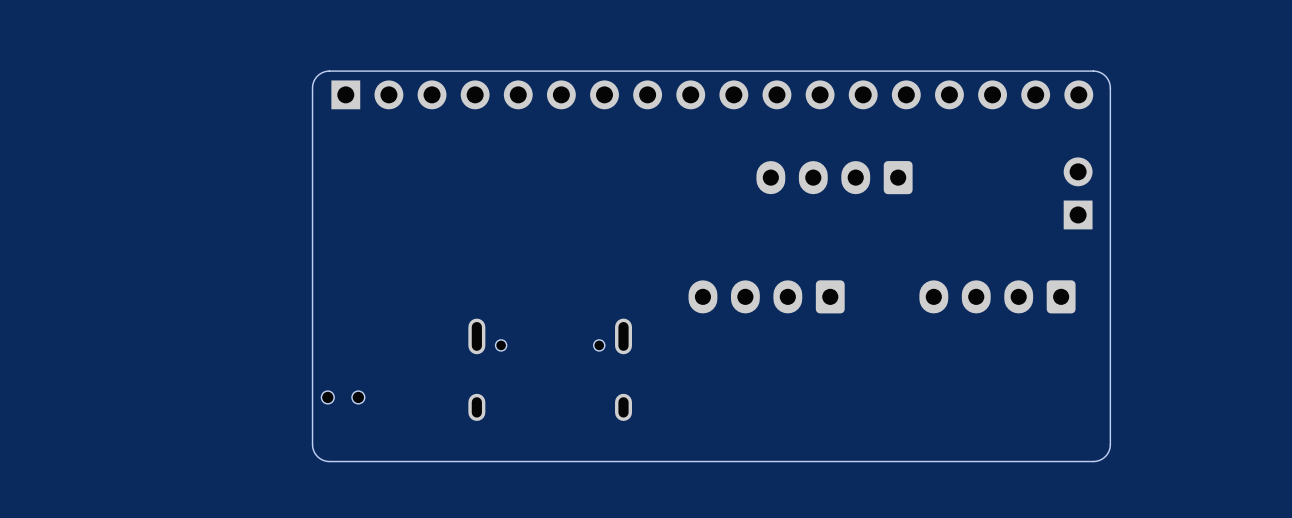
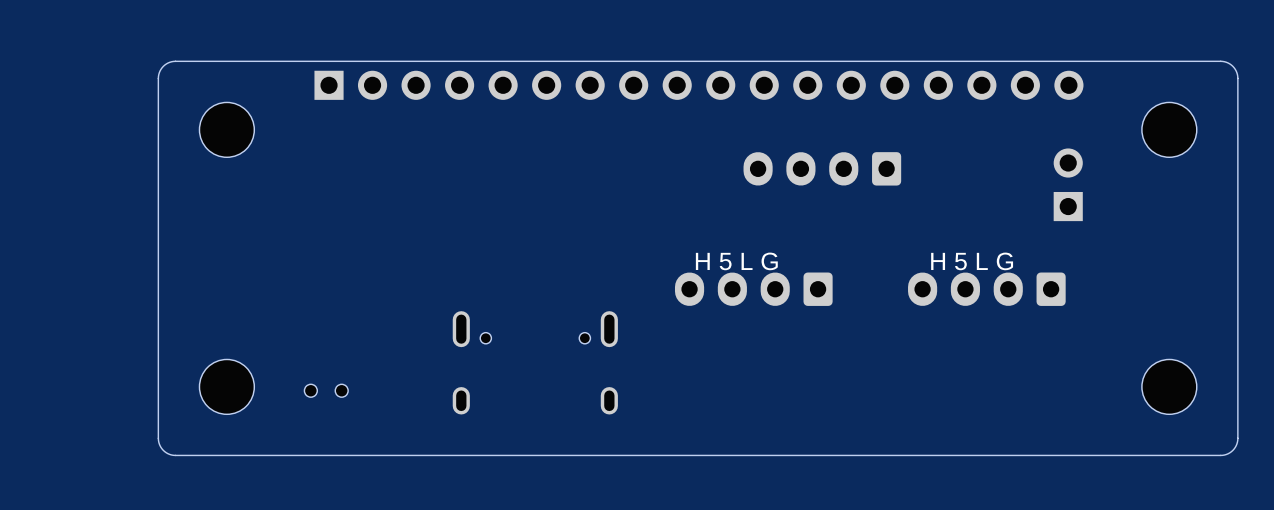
board edge: (329, 71) (317, 76) (312, 88) (312, 444) (317, 456) (329, 461) -> (312, 61) (173, 61) (163, 66) (158, 78) (159, 443) (164, 451) (173, 455) (312, 455)
board edge: (1093, 71) (1105, 76) (1110, 88) (1110, 444) (1105, 456) (1093, 461) -> (1083, 61) (1222, 61) (1232, 66) (1237, 78) (1236, 443) (1231, 451) (1222, 455) (1083, 455)
part: none -> (226, 129)
part: none -> (1169, 129)
text: none -> H 5 L G (736, 261)
text: none -> H 5 L G (972, 261)
part: none -> (226, 386)
part: none -> (1169, 386)

